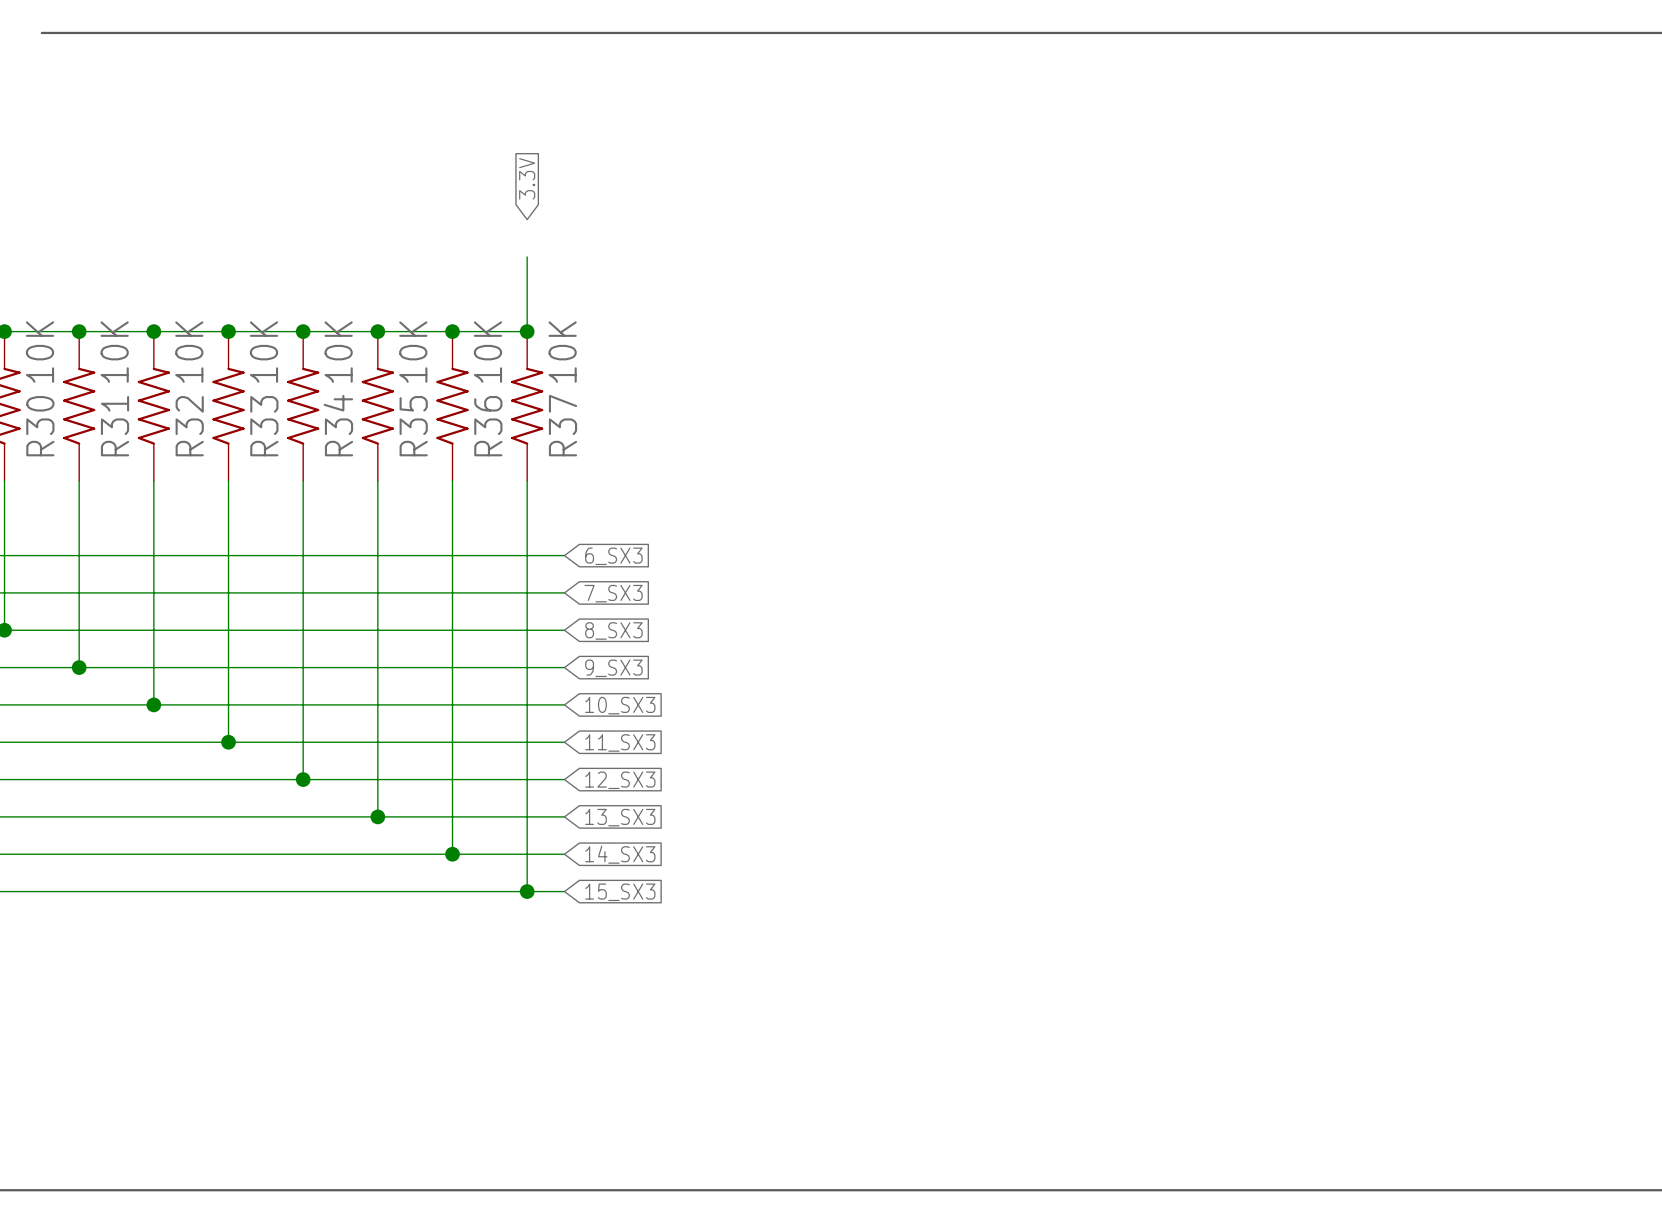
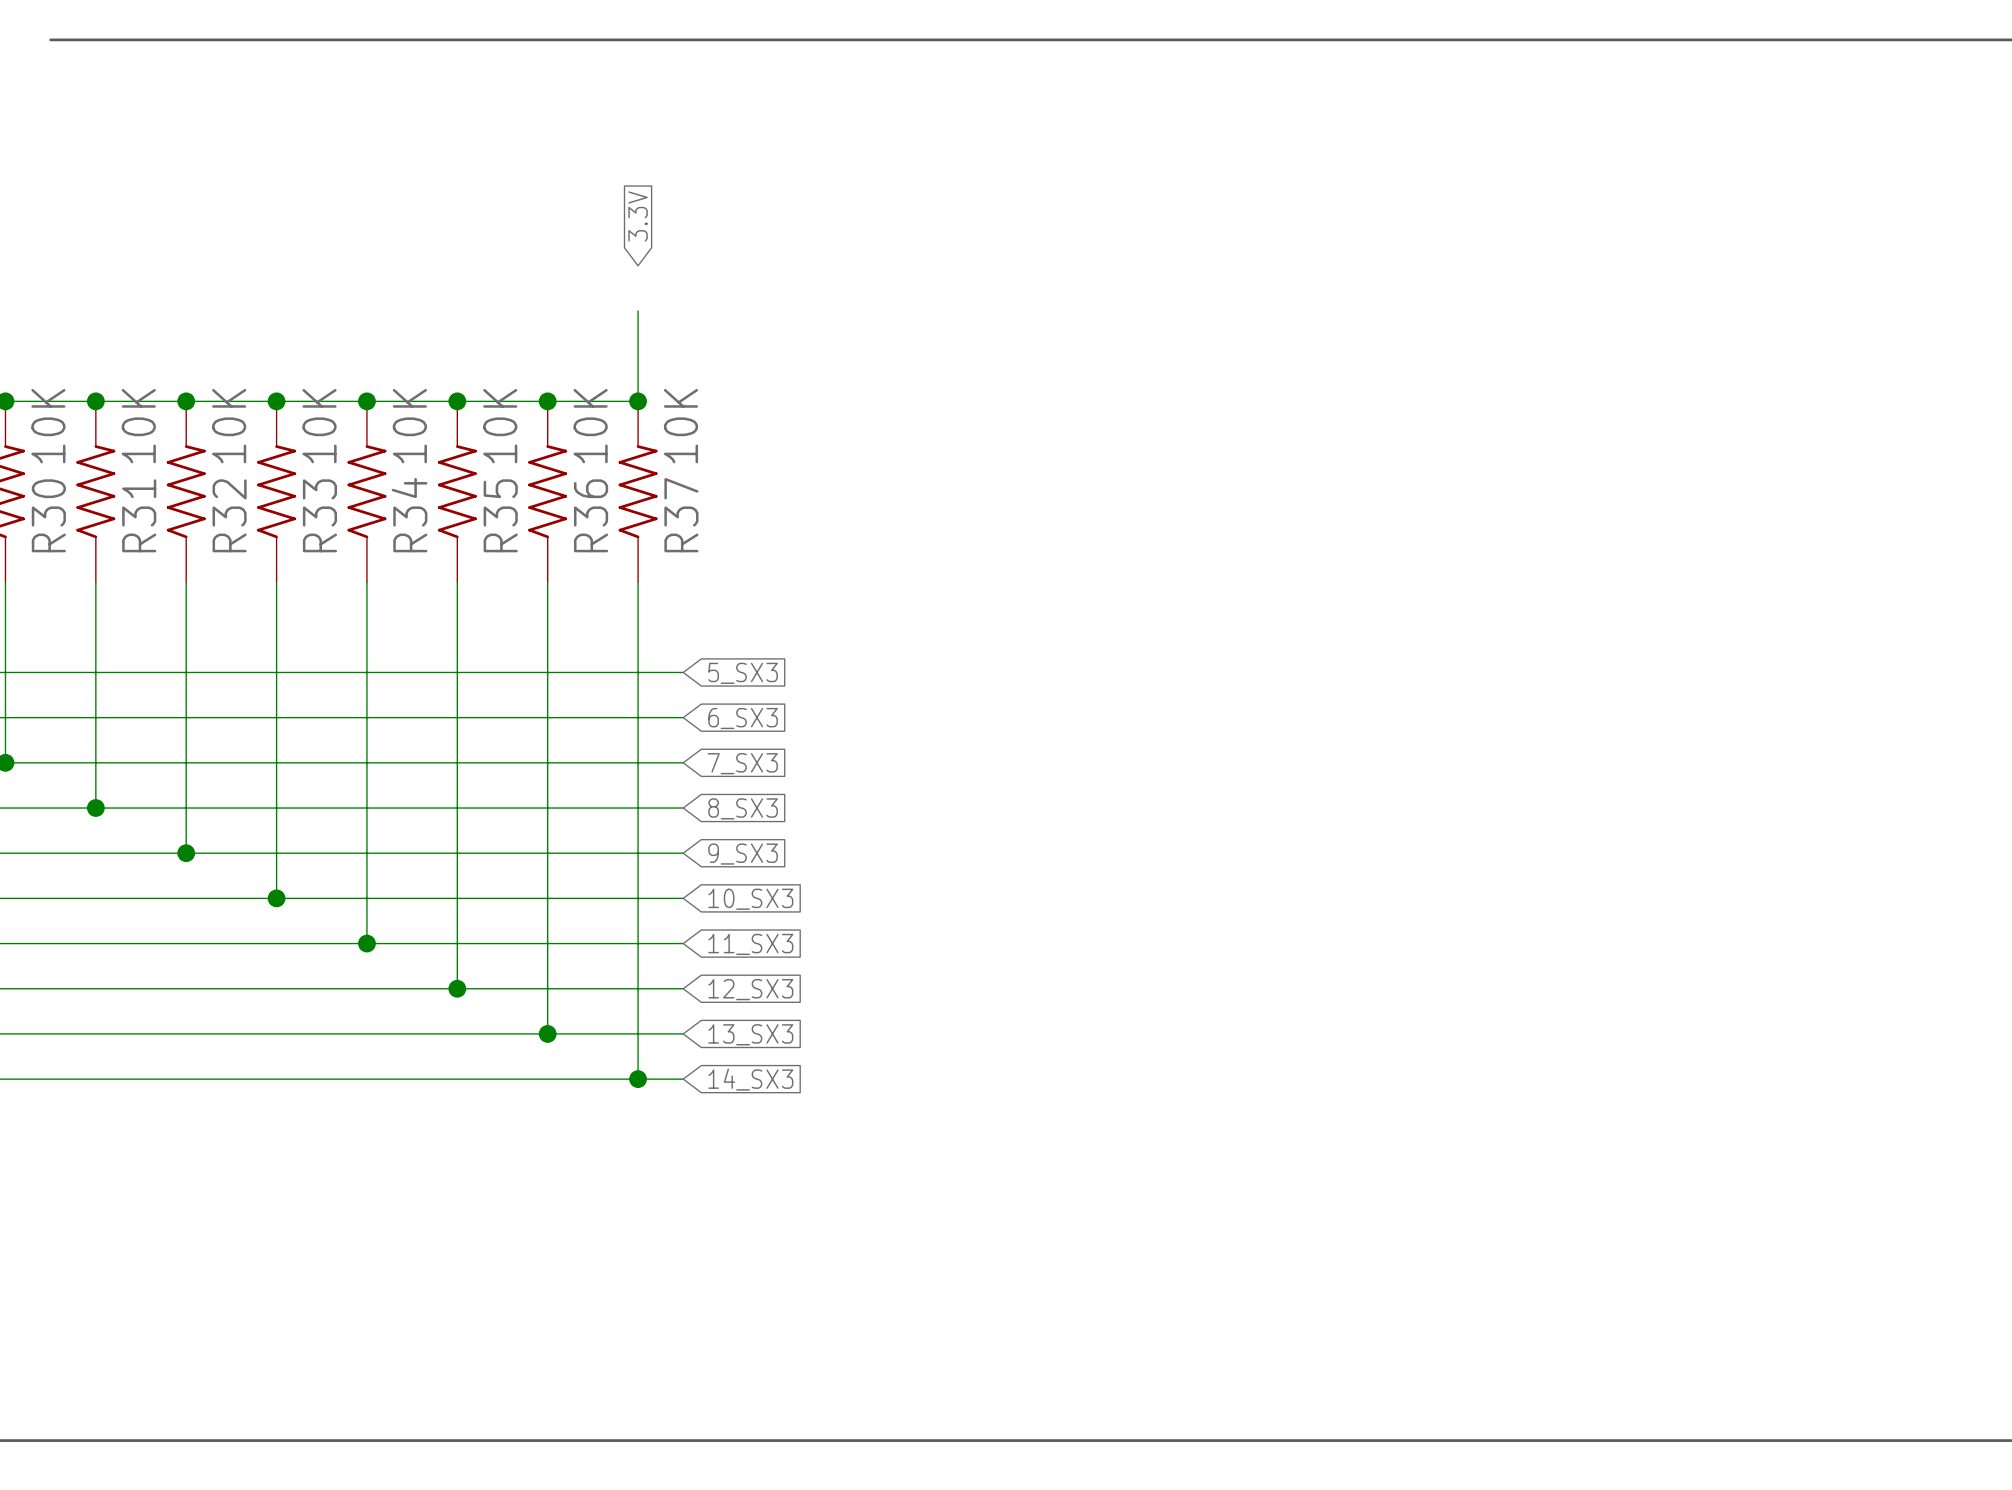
global label: 6_SX3 (613, 556) -> 5_SX3 (743, 673)
global label: 7_SX3 (613, 593) -> 6_SX3 (743, 718)
global label: 8_SX3 (613, 630) -> 7_SX3 (742, 763)
global label: 9_SX3 (613, 668) -> 8_SX3 (743, 808)
global label: 10_SX3 (620, 705) -> 9_SX3 (743, 854)
global label: 11_SX3 (620, 742) -> 10_SX3 (750, 899)
global label: 12_SX3 (620, 780) -> 11_SX3 (750, 944)
global label: 13_SX3 (620, 817) -> 12_SX3 (750, 989)
global label: 14_SX3 (620, 854) -> 13_SX3 (750, 1034)
global label: 15_SX3 (620, 892) -> 14_SX3 (750, 1079)

